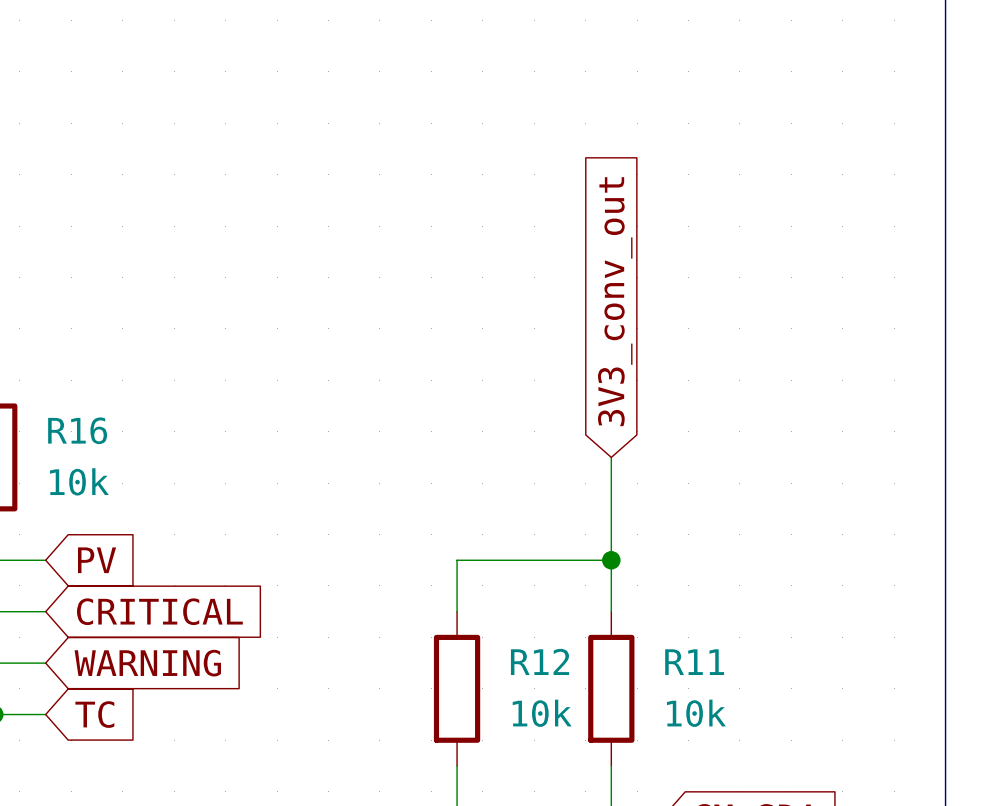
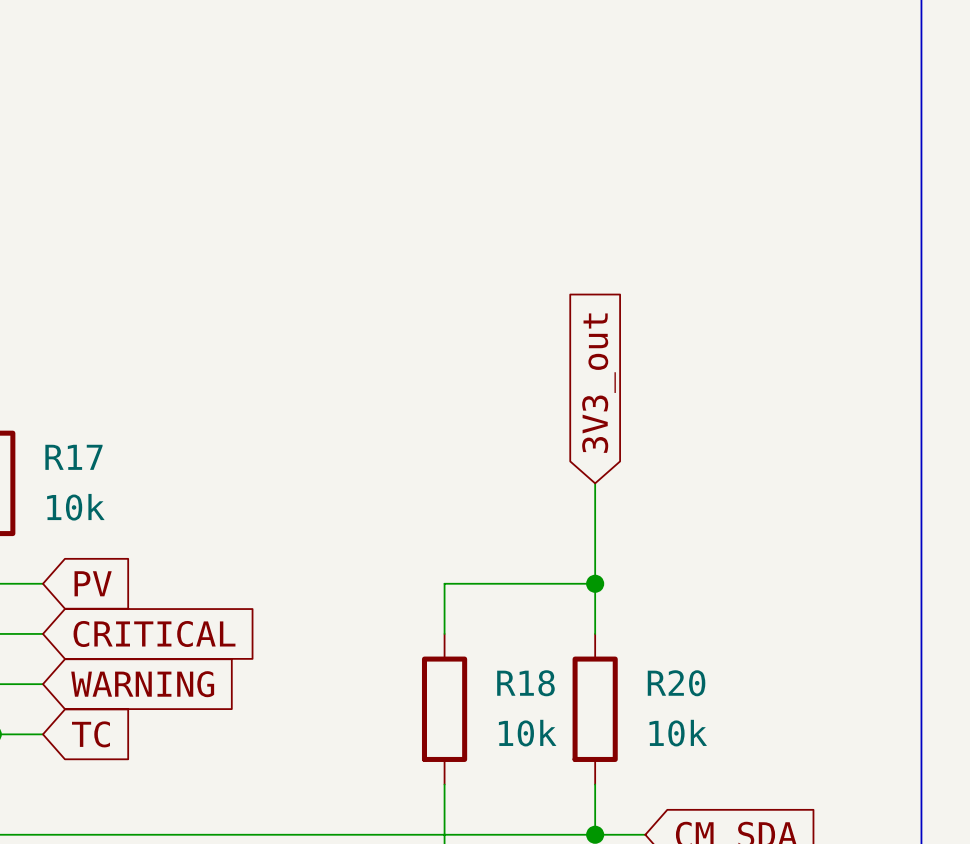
global label: 3V3_conv_out (615, 301) -> 3V3_out (598, 383)
R16 name: R16 (77, 430) -> R17 (73, 457)
R12 name: R12 (540, 661) -> R18 (525, 683)
R11 name: R11 (694, 662) -> R20 (676, 683)

